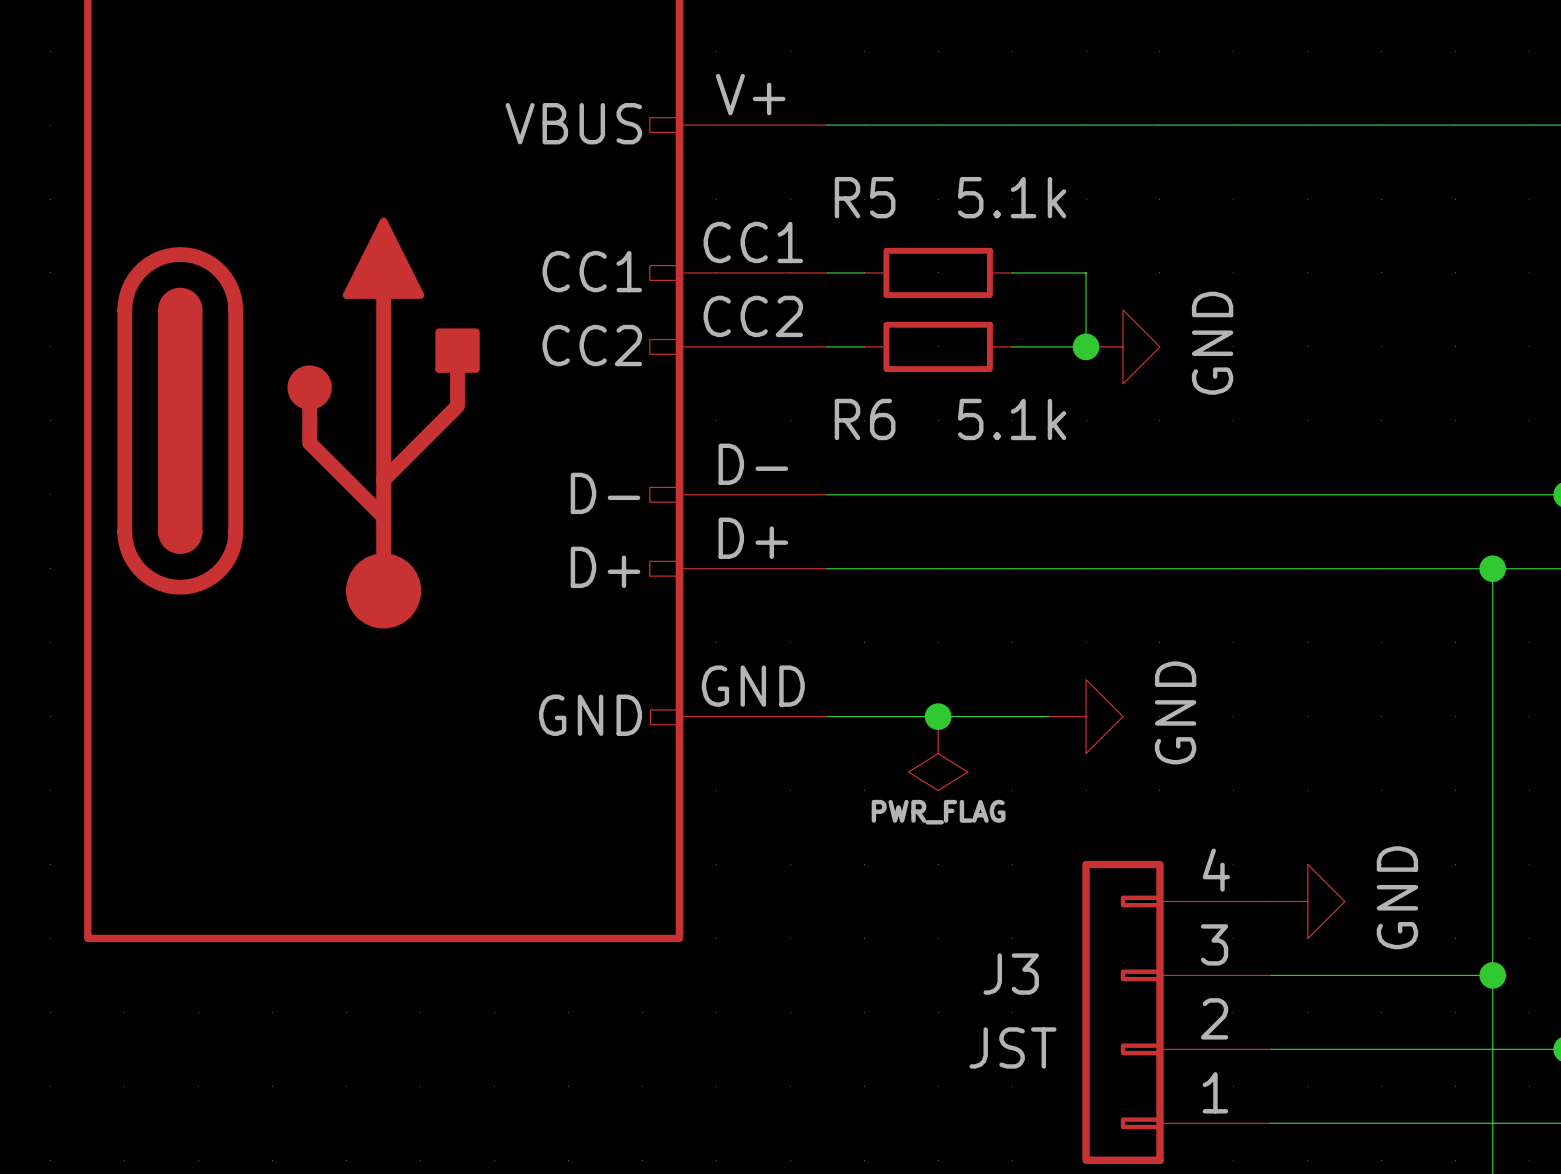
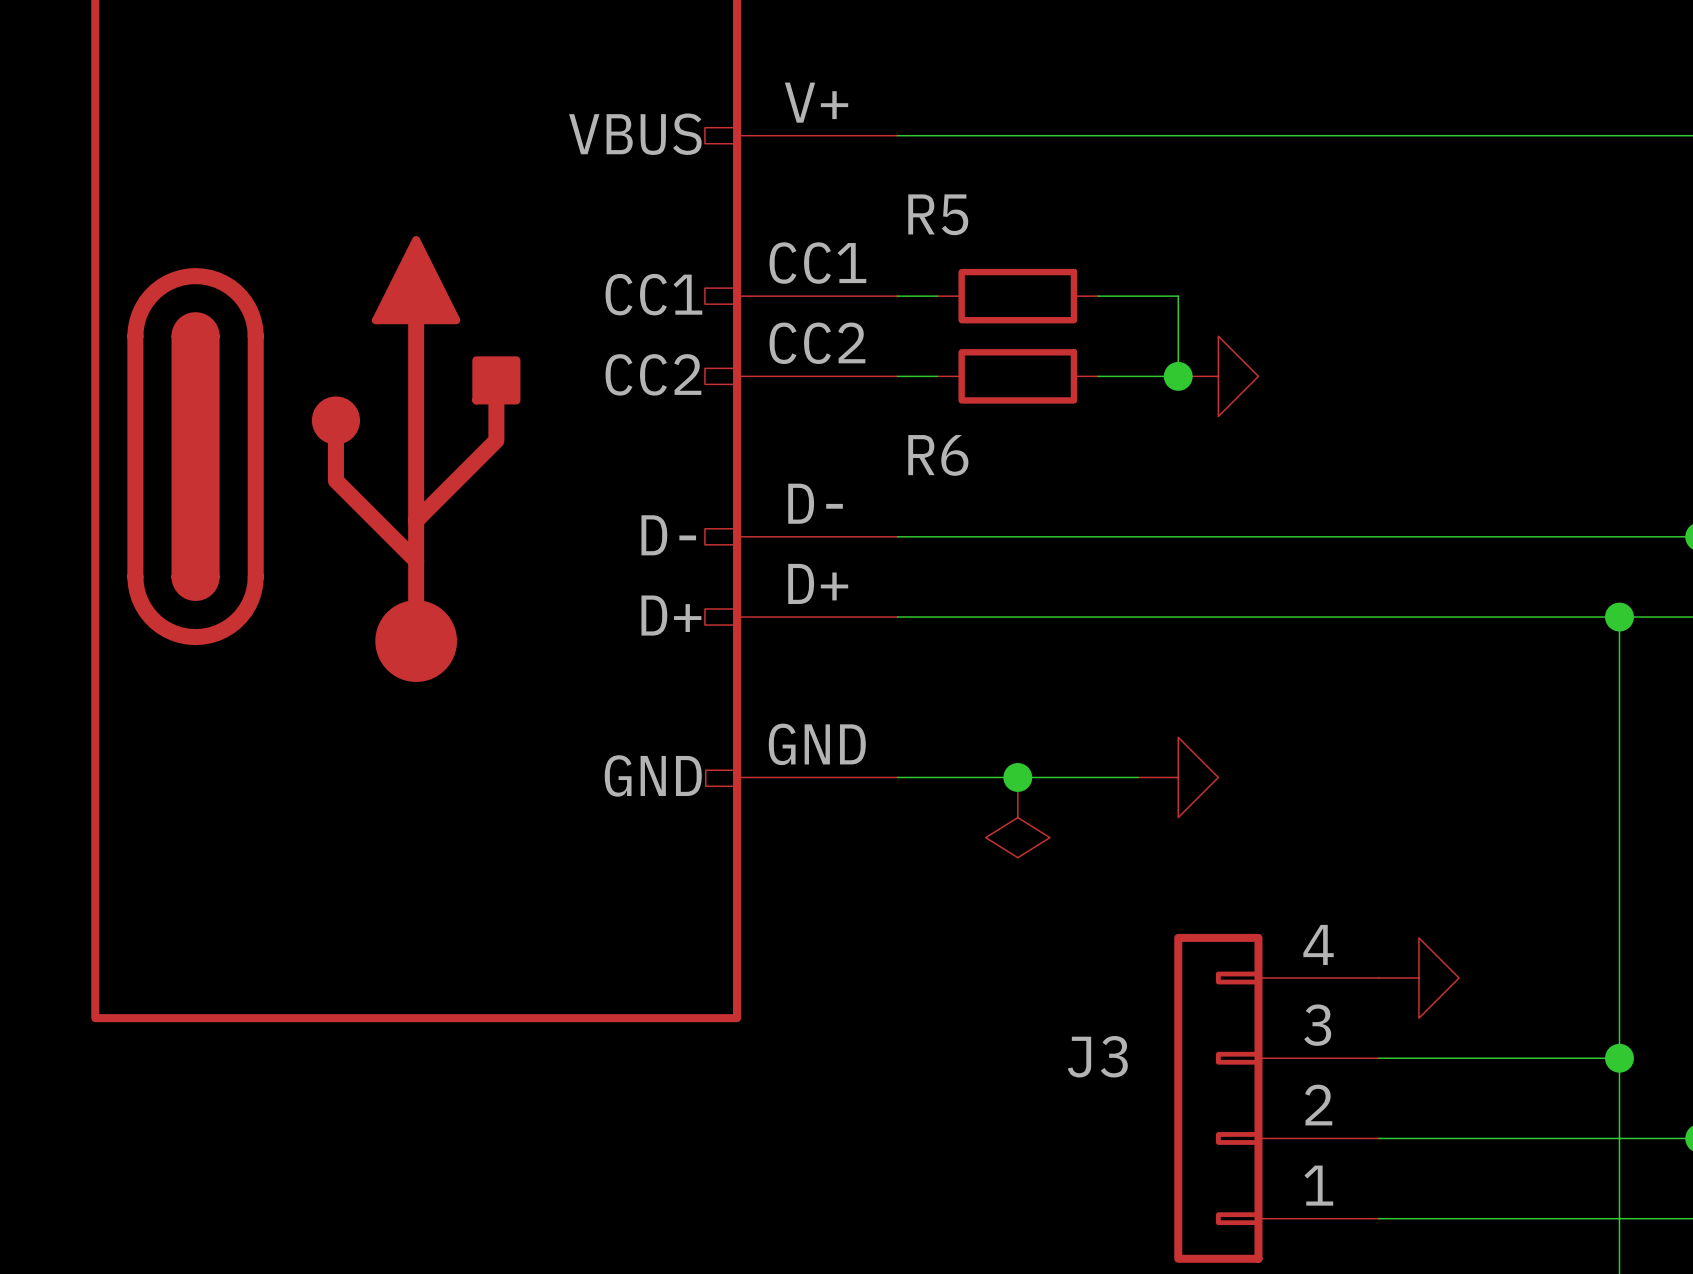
R5 value: 5.1k (1012, 197) -> none
power symbol text: GND (1212, 343) -> none
R6 value: 5.1k (1012, 419) -> none
power symbol text: GND (1175, 712) -> none
power symbol text: PWR_FLAG (938, 812) -> none
power symbol text: GND (1397, 897) -> none
J3 value: JST (1012, 1047) -> none

